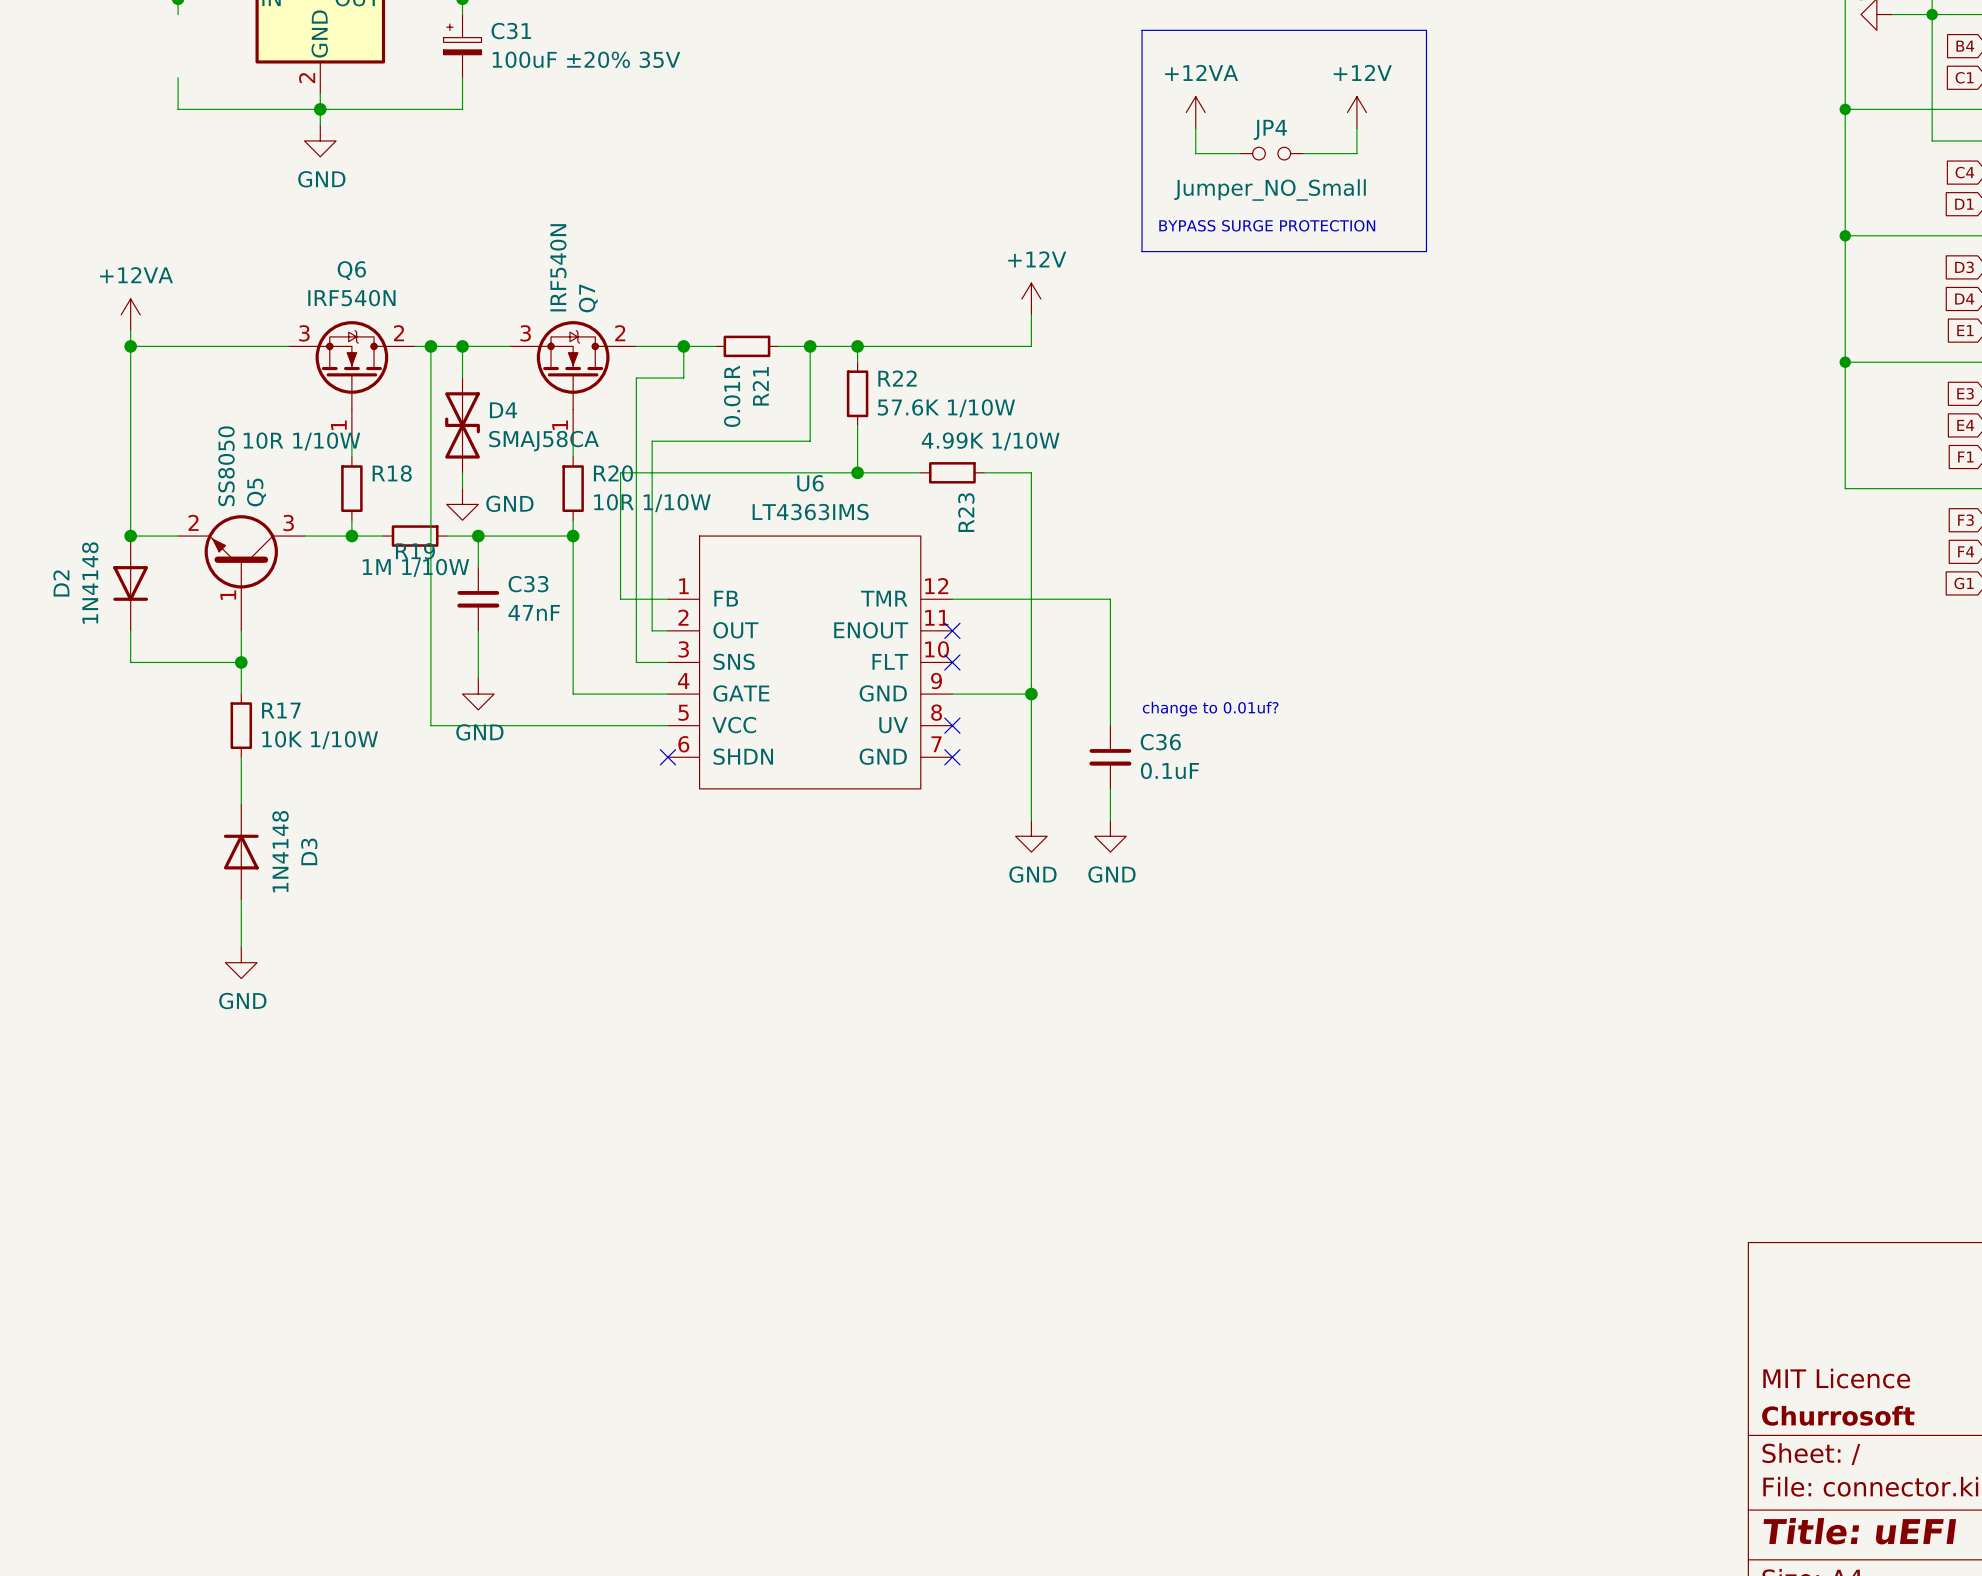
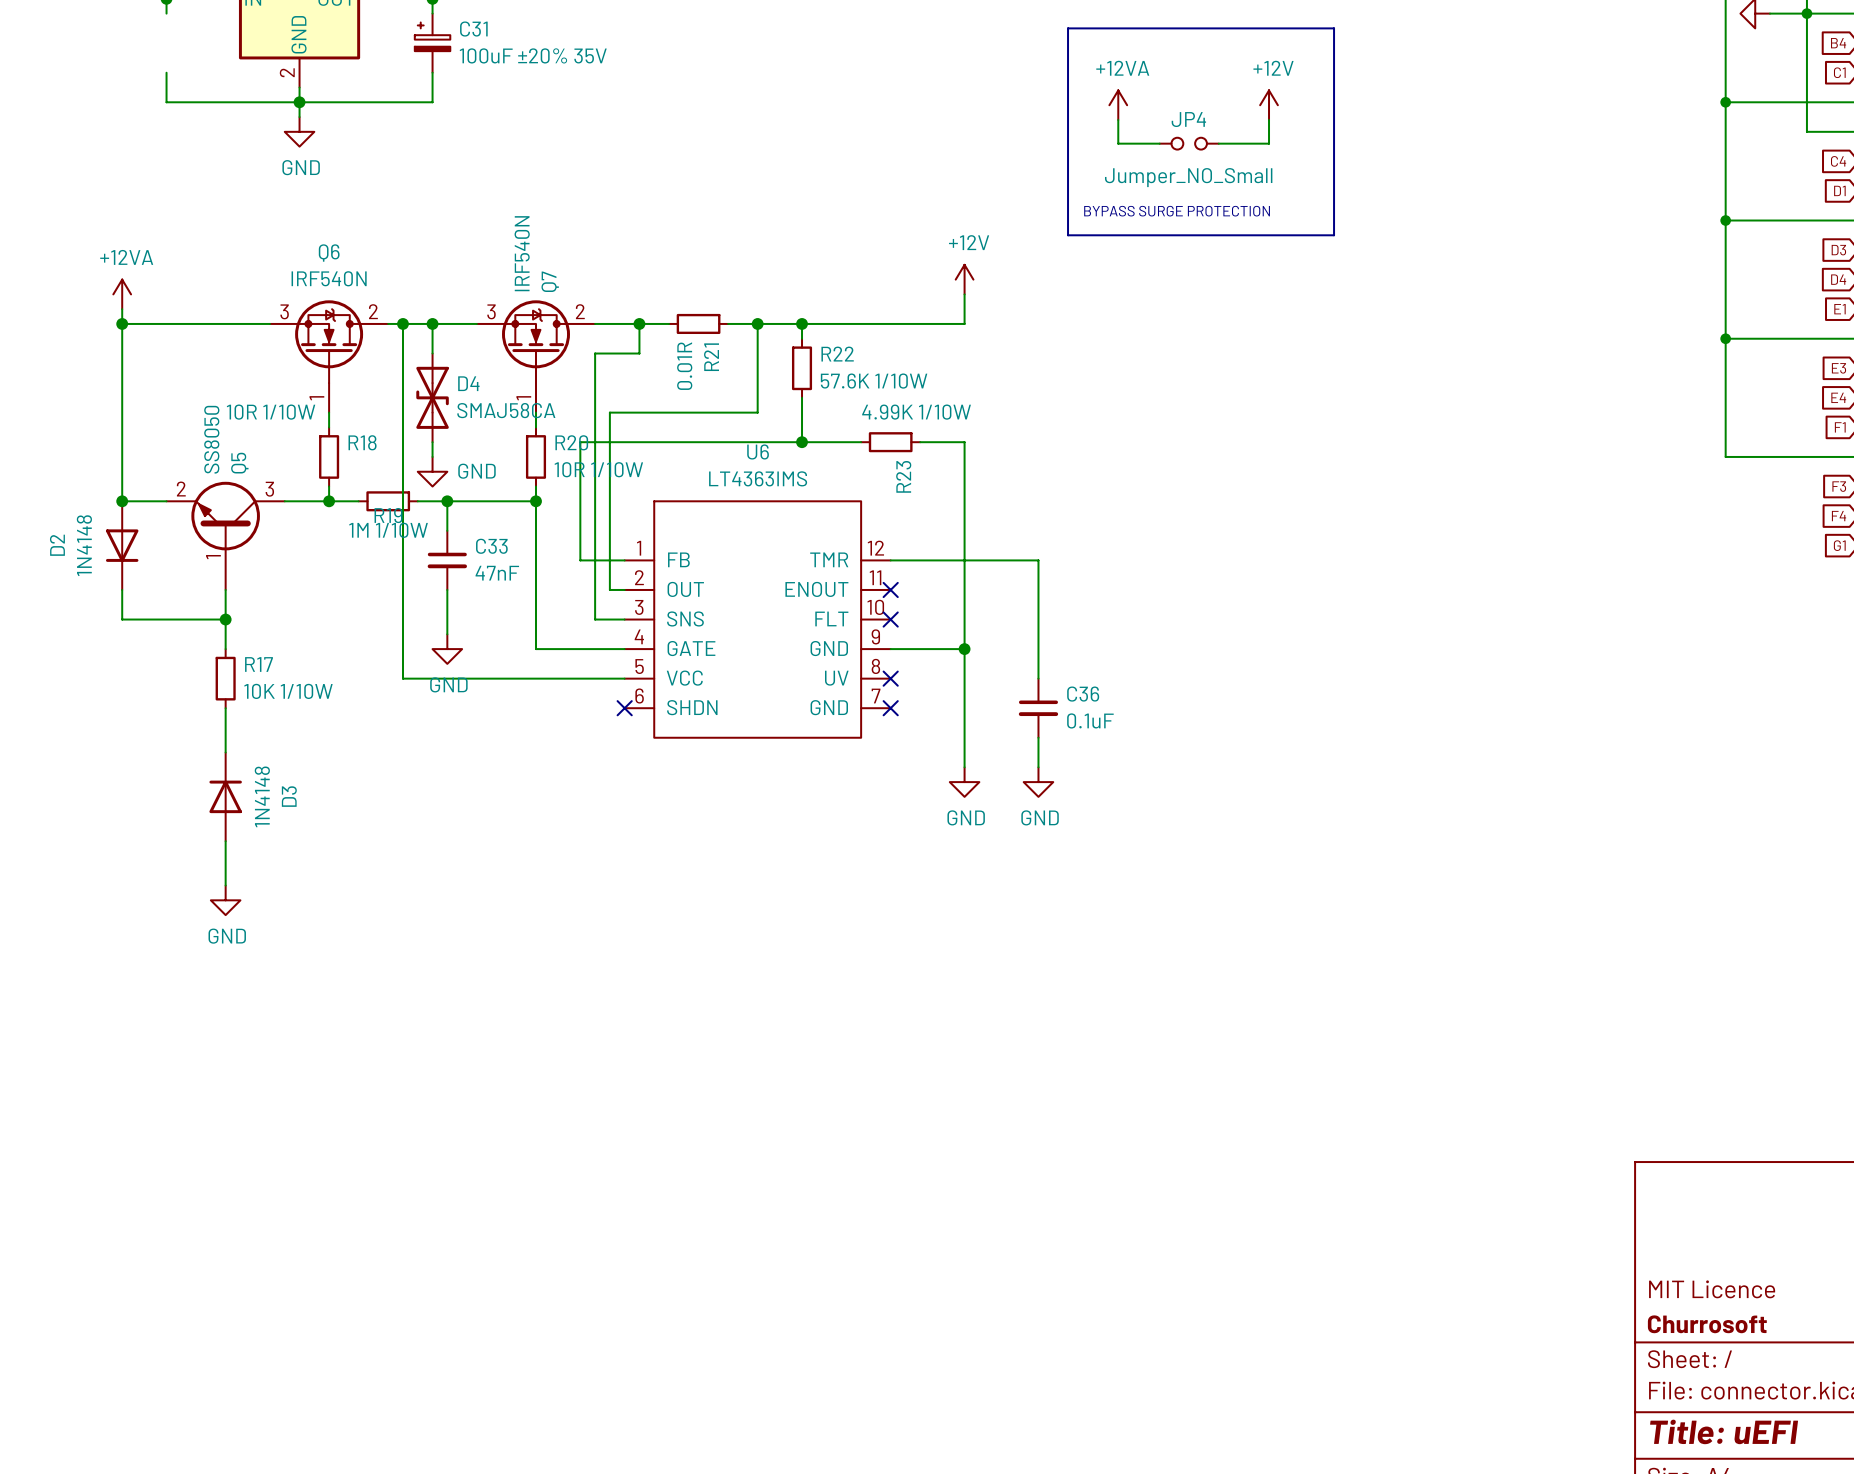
text: change to 0.01uf? (1210, 709) -> none

